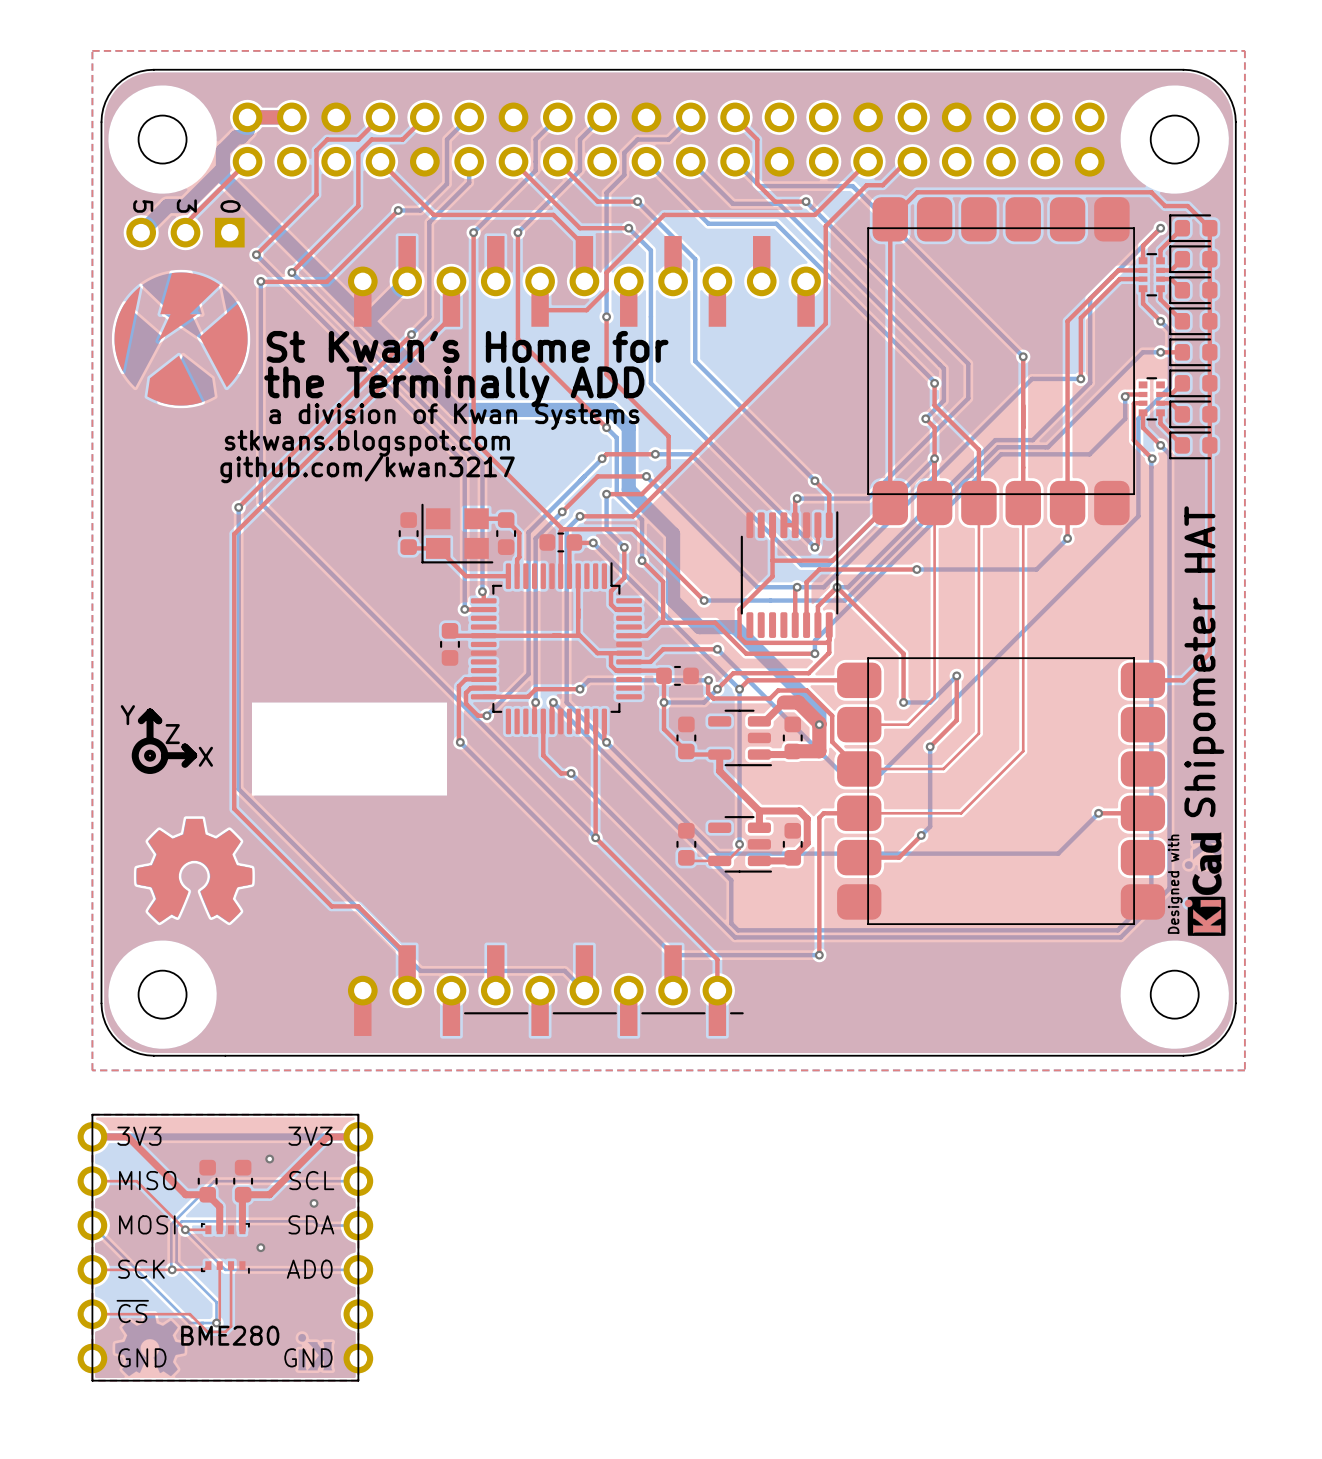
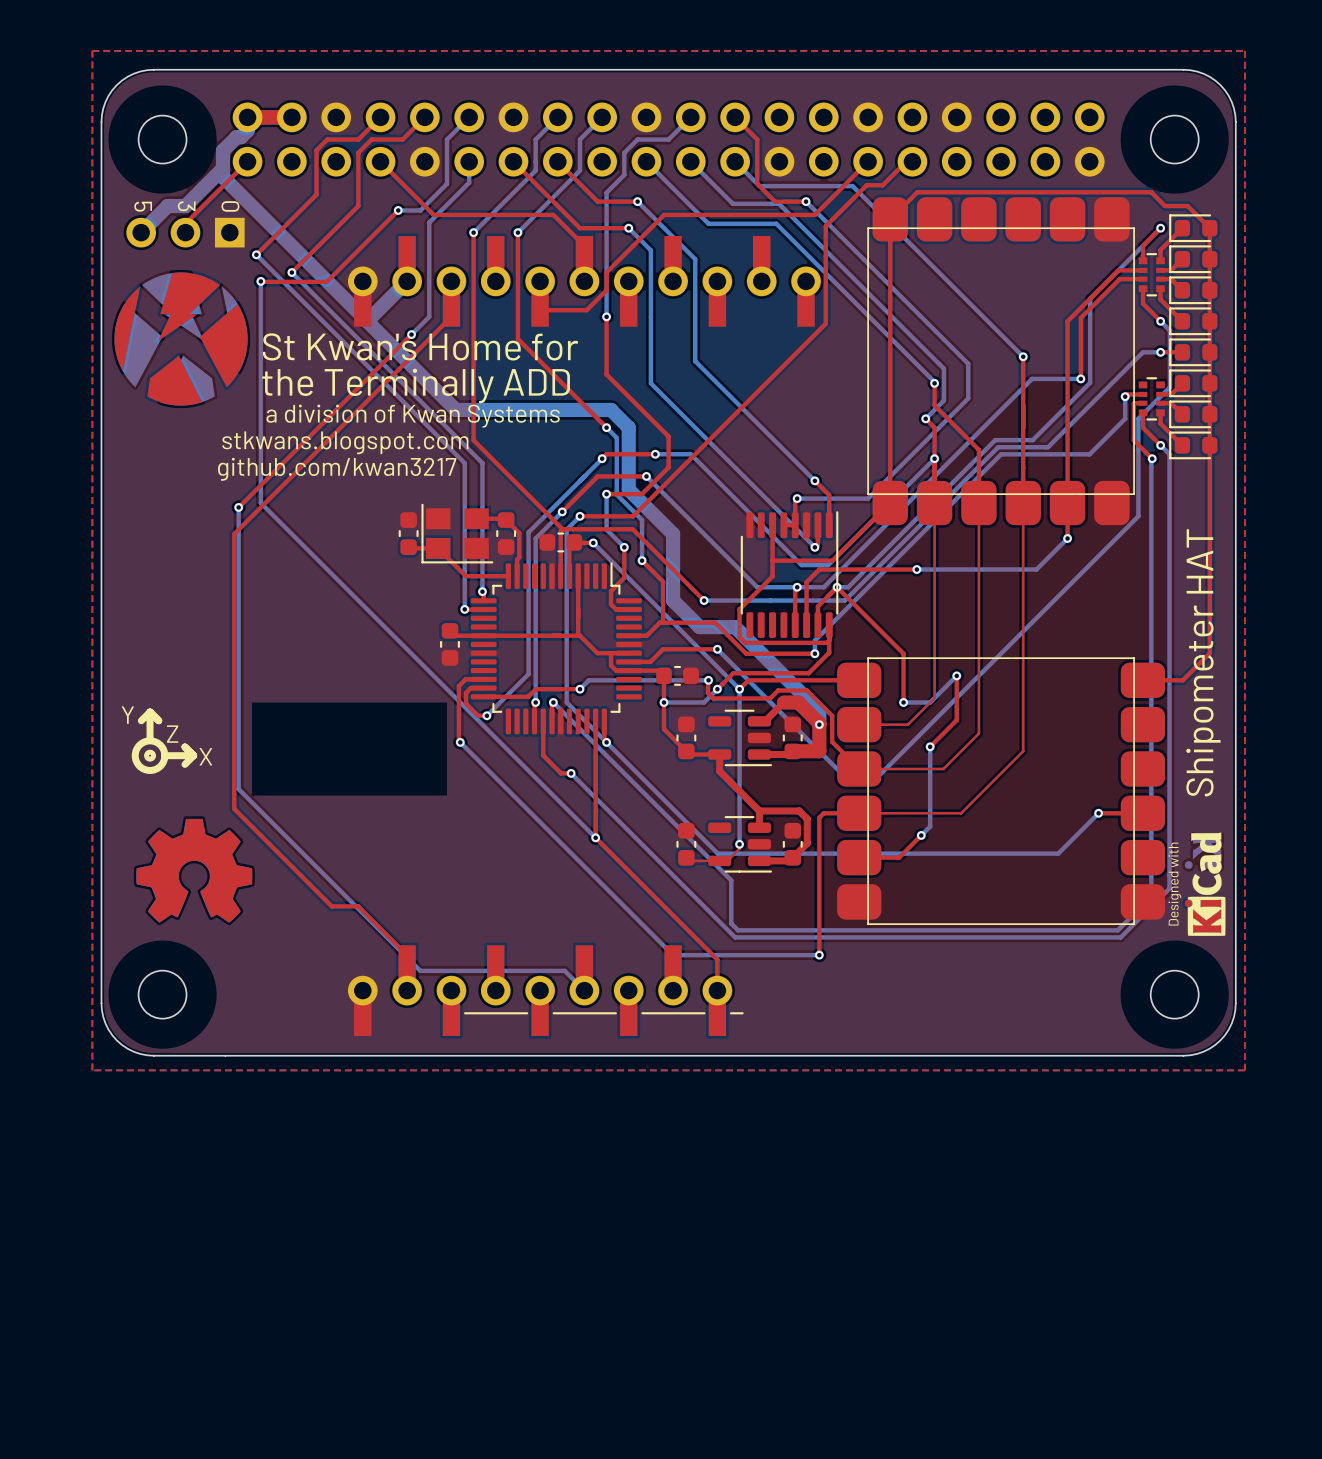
top track: (92, 1136) (127, 1136) (185, 1194) (207, 1194) (219, 1206) (219, 1229) -> none
bottom track: (92, 1136) (358, 1136) -> none
top track: (358, 1136) (327, 1136) (269, 1194) (243, 1194) (242, 1229) -> none
via: (269, 1159) -> none
top track: (92, 1181) (136, 1181) (185, 1229) (208, 1229) -> none
part: (207, 1181) -> none
part: (243, 1181) -> none
bottom track: (358, 1181) (214, 1181) (171, 1224) (172, 1269) -> none
via: (314, 1203) -> none
bottom track: (92, 1225) (189, 1323) (216, 1323) (216, 1302) (176, 1262) (176, 1226) (181, 1221) (314, 1221) (318, 1225) (358, 1225) -> none
bottom track: (185, 1229) (225, 1269) (358, 1269) -> none
via: (185, 1229) -> none
part: (225, 1247) -> none
via: (260, 1247) -> none
part: BME280 (225, 1248) -> none
top track: (208, 1265) (204, 1269) (92, 1269) -> none
top track: (219, 1265) (219, 1319) (216, 1323) -> none
top track: (231, 1265) (231, 1326) (225, 1331) (207, 1331) (189, 1314) (92, 1314) -> none
via: (172, 1269) -> none
drawing: [115, 1313, 185, 1377] -> none
via: (216, 1323) -> none
drawing: [298, 1333, 333, 1371] -> none

